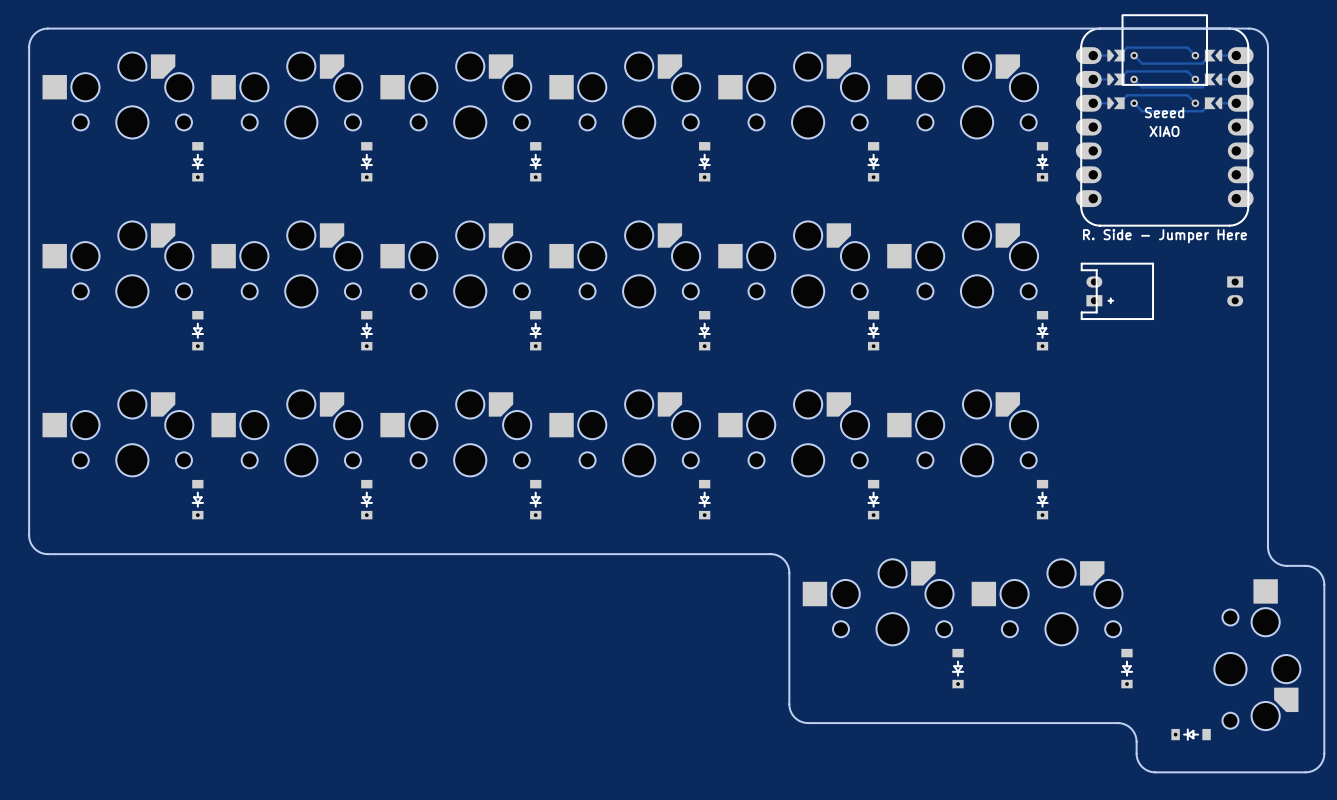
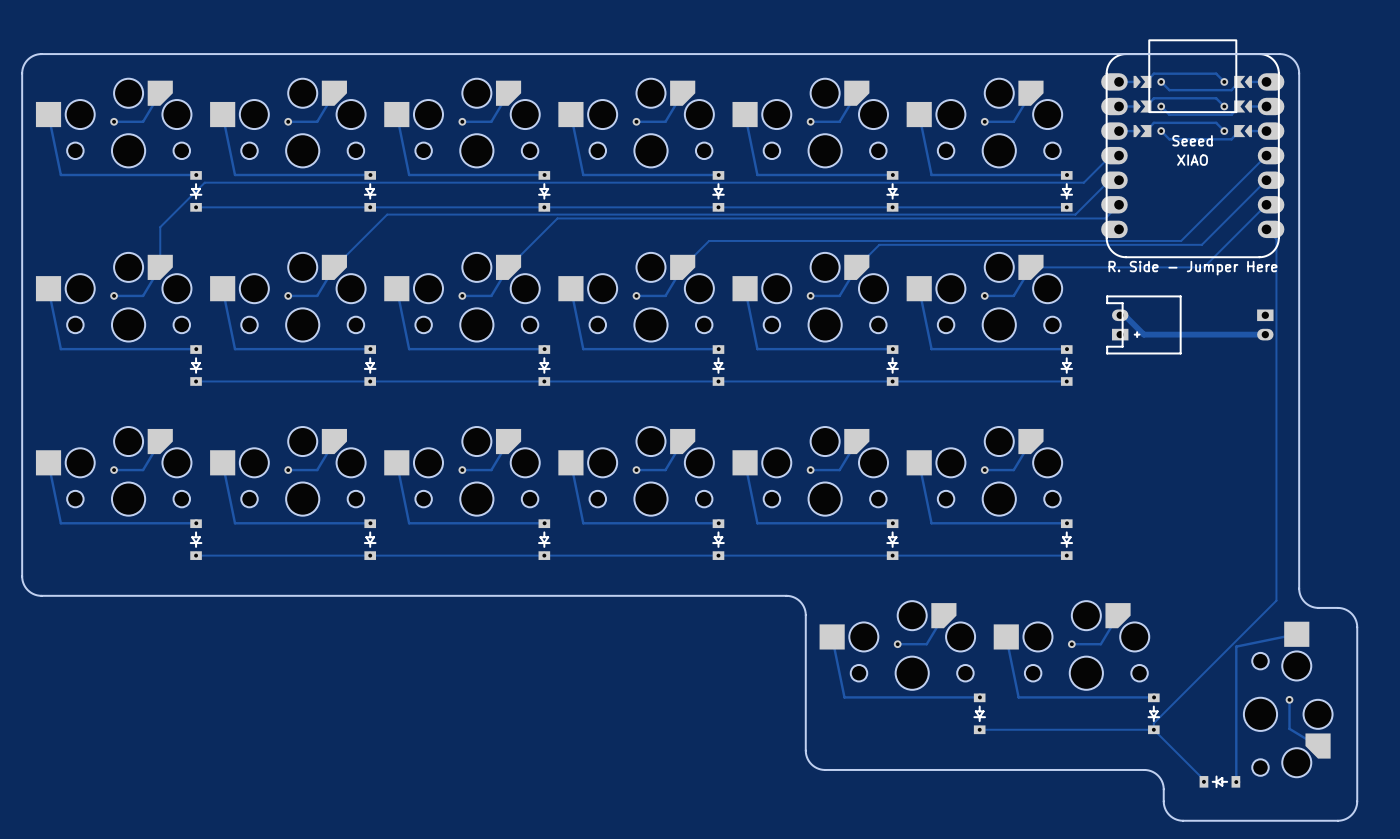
part footprint: [42, 52, 194, 139] -> [35, 78, 201, 179]
part footprint: [211, 52, 363, 139] -> [210, 78, 375, 179]
part footprint: [380, 52, 532, 139] -> [384, 78, 549, 179]
part footprint: [549, 52, 701, 139] -> [558, 78, 723, 179]
part footprint: [718, 52, 870, 139] -> [732, 78, 897, 179]
part footprint: [887, 52, 1039, 139] -> [906, 78, 1071, 179]
track: none -> (160, 93) (143, 121) (114, 121)
track: none -> (334, 93) (317, 121) (288, 121)
track: none -> (508, 93) (491, 121) (462, 121)
track: none -> (682, 93) (665, 121) (636, 121)
track: none -> (856, 93) (839, 121) (810, 121)
track: none -> (1031, 93) (1013, 121) (984, 121)
track: none -> (48, 114) (60, 174) (196, 174)
track: none -> (222, 114) (234, 174) (370, 174)
track: none -> (396, 114) (409, 174) (544, 174)
track: none -> (570, 114) (583, 174) (718, 174)
track: none -> (745, 114) (757, 174) (892, 174)
track: none -> (919, 114) (931, 174) (1066, 174)
track: none -> (1119, 155) (1110, 155) (1083, 182) (204, 182) (160, 227) (160, 267) (143, 295) (114, 295)
track: none -> (1266, 155) (1181, 240) (709, 240) (682, 267) (665, 295) (636, 295)
track: none -> (1119, 180) (1109, 180) (1075, 214) (387, 214) (334, 267) (317, 295) (288, 295)
track: none -> (1266, 180) (1201, 244) (879, 244) (856, 267) (839, 295) (810, 295)
track: none -> (1119, 204) (1105, 218) (557, 218) (508, 267) (491, 295) (462, 295)
track: none -> (1266, 204) (1203, 267) (1030, 267) (1013, 295) (984, 295)
track: none -> (196, 207) (1066, 207)
track: none -> (1266, 229) (1276, 239) (1276, 600) (1153, 723) (1153, 729)
part footprint: [42, 221, 194, 308] -> [35, 252, 201, 354]
part footprint: [211, 221, 363, 308] -> [210, 252, 375, 354]
part footprint: [380, 221, 532, 308] -> [384, 252, 549, 354]
part footprint: [549, 221, 701, 308] -> [558, 252, 723, 354]
part footprint: [718, 221, 870, 308] -> [732, 252, 897, 354]
part footprint: [887, 221, 1039, 308] -> [906, 252, 1071, 354]
track: none -> (48, 288) (60, 349) (196, 349)
track: none -> (222, 288) (234, 349) (370, 349)
track: none -> (396, 288) (409, 349) (544, 349)
track: none -> (570, 288) (583, 349) (718, 349)
track: none -> (745, 288) (757, 349) (892, 349)
track: none -> (919, 288) (931, 349) (1066, 349)
track: none -> (1120, 315) (1124, 315) (1143, 334) (1265, 334)
track: none -> (196, 381) (1066, 381)
part footprint: [42, 390, 194, 477] -> [35, 427, 201, 528]
part footprint: [211, 390, 363, 477] -> [210, 427, 375, 528]
part footprint: [380, 390, 532, 477] -> [384, 427, 549, 528]
part footprint: [549, 390, 701, 477] -> [558, 427, 723, 528]
part footprint: [718, 390, 870, 477] -> [732, 427, 897, 528]
part footprint: [887, 390, 1039, 477] -> [906, 427, 1071, 528]
track: none -> (160, 441) (143, 470) (114, 470)
track: none -> (334, 441) (317, 470) (288, 470)
track: none -> (508, 441) (491, 470) (462, 470)
track: none -> (682, 441) (665, 470) (636, 470)
track: none -> (856, 441) (839, 470) (810, 470)
track: none -> (1031, 441) (1013, 470) (984, 470)
track: none -> (48, 462) (60, 523) (196, 523)
track: none -> (222, 462) (234, 523) (370, 523)
track: none -> (396, 462) (409, 523) (544, 523)
track: none -> (570, 462) (583, 523) (718, 523)
track: none -> (745, 462) (757, 523) (892, 523)
track: none -> (919, 462) (931, 523) (1066, 523)
track: none -> (196, 555) (1066, 555)
part footprint: [802, 559, 954, 646] -> [819, 601, 984, 702]
part footprint: [971, 559, 1123, 646] -> [993, 601, 1158, 702]
track: none -> (943, 615) (926, 644) (897, 644)
track: none -> (1118, 615) (1100, 644) (1071, 644)
part footprint: [1214, 579, 1301, 731] -> [1232, 621, 1333, 786]
track: none -> (1296, 634) (1236, 646) (1236, 782)
track: none -> (832, 636) (844, 697) (979, 697)
track: none -> (1006, 636) (1018, 697) (1154, 697)
track: none -> (1289, 699) (1289, 728) (1318, 746)
track: none -> (979, 729) (1153, 729)
track: none -> (1153, 729) (1203, 781)

